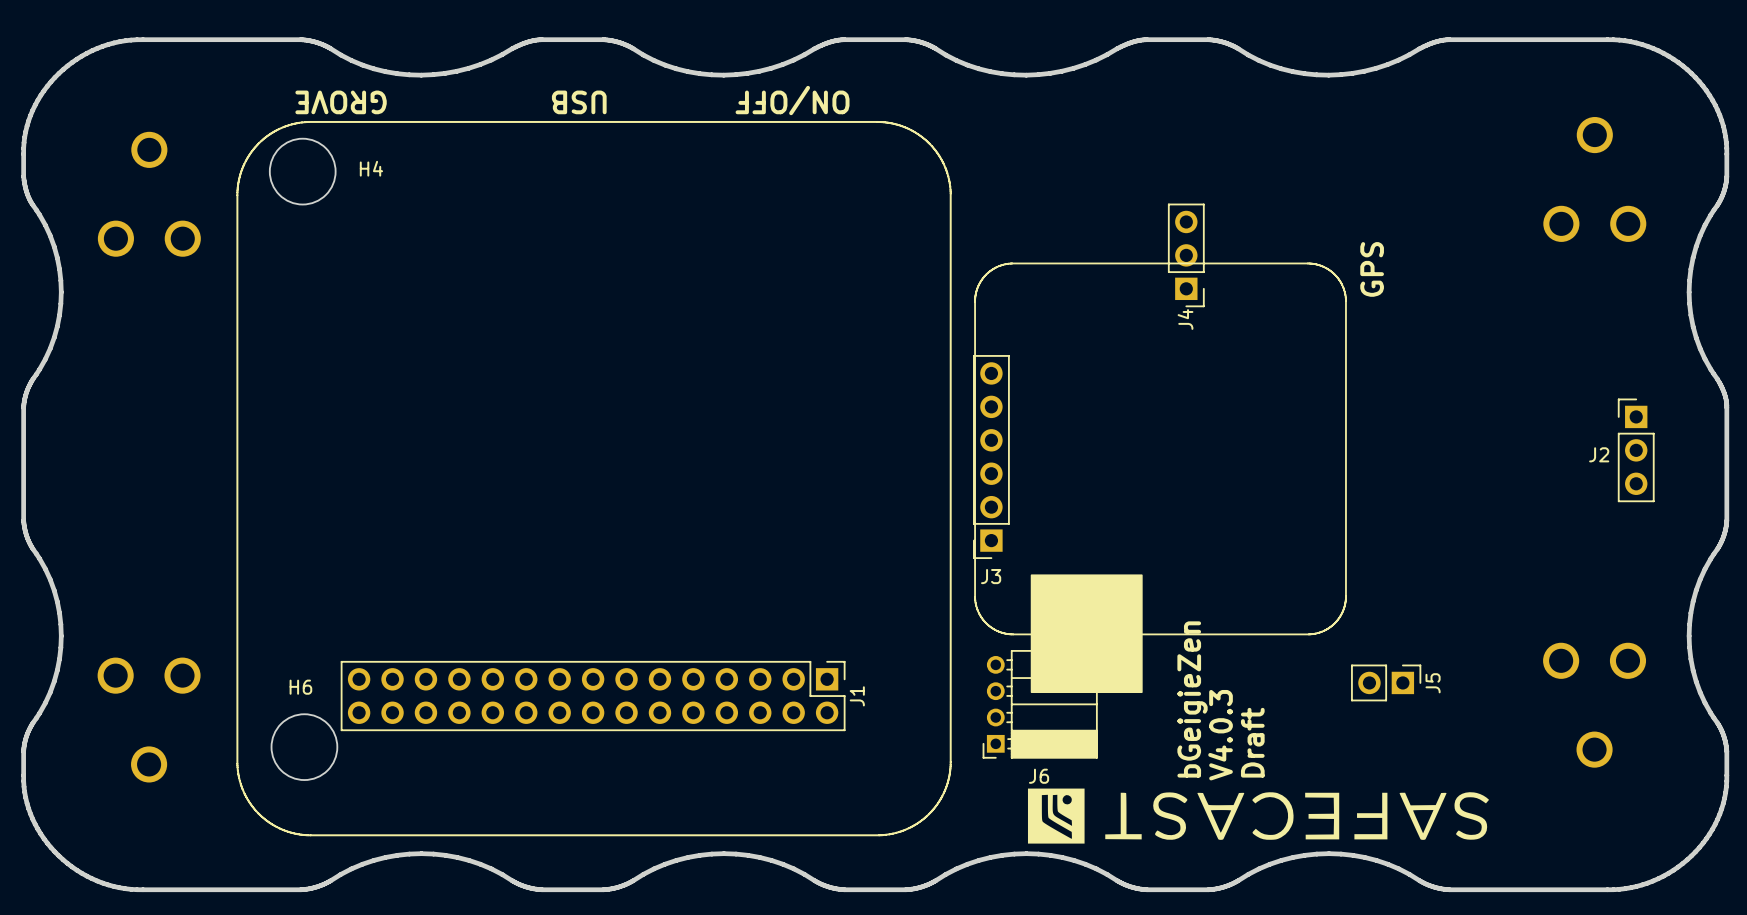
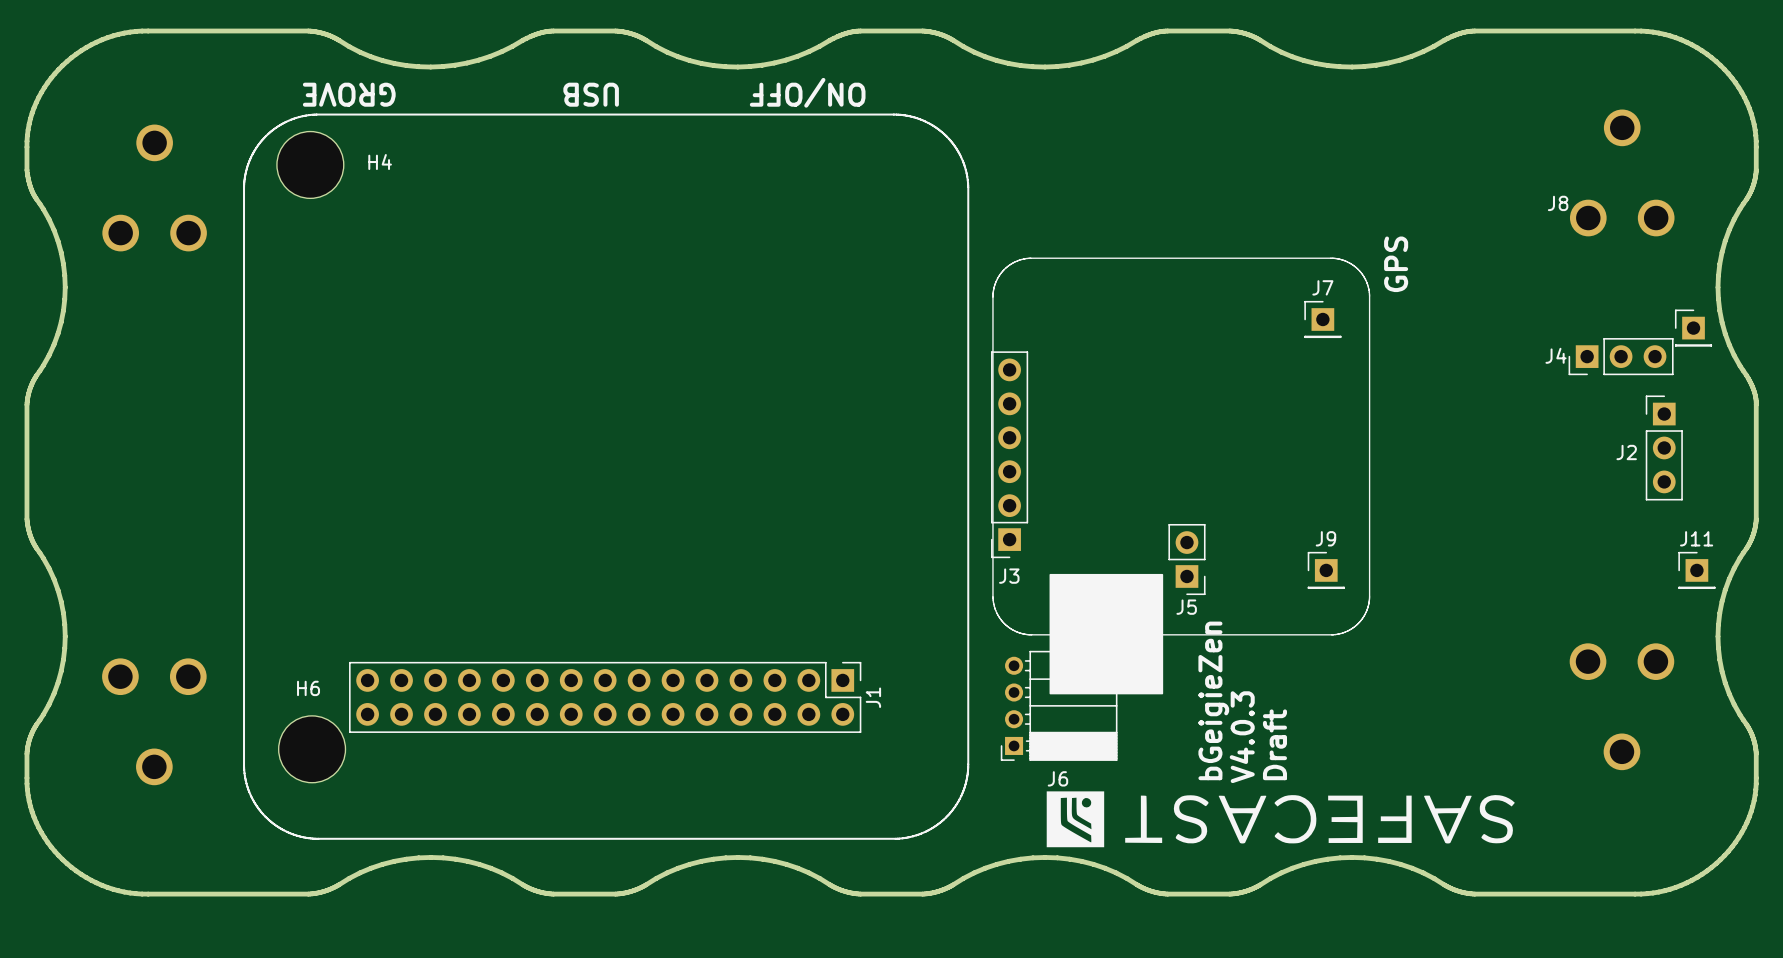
J4 rotation: 0° (1186, 255) -> 90° clockwise (1621, 356)
J4 position: (1186, 255) -> (1621, 356)
J7: none -> (1322, 319)
J8: none -> (1693, 328)
J9: none -> (1326, 570)
J11: none -> (1696, 570)
J5 rotation: 0° (1386, 682) -> 90° clockwise (1186, 559)
J5 position: (1386, 682) -> (1186, 559)

